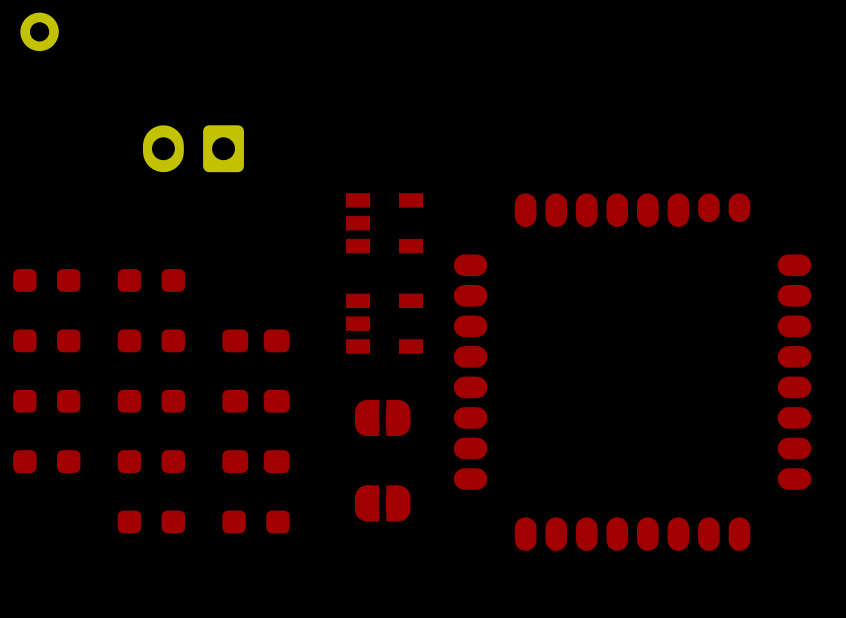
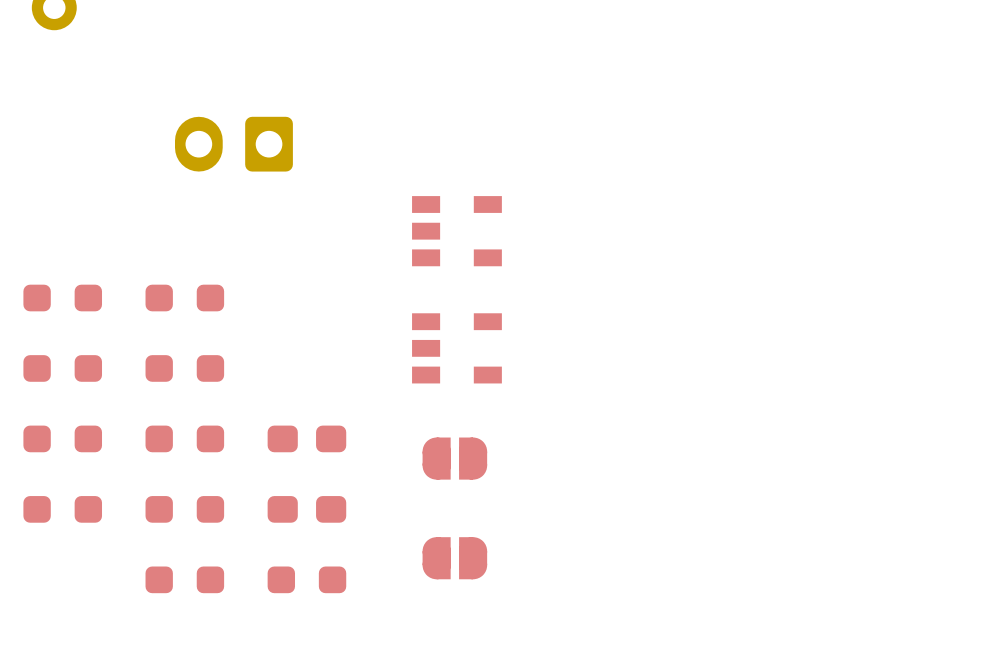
part: (255, 340) -> none
part: (632, 372) -> none

